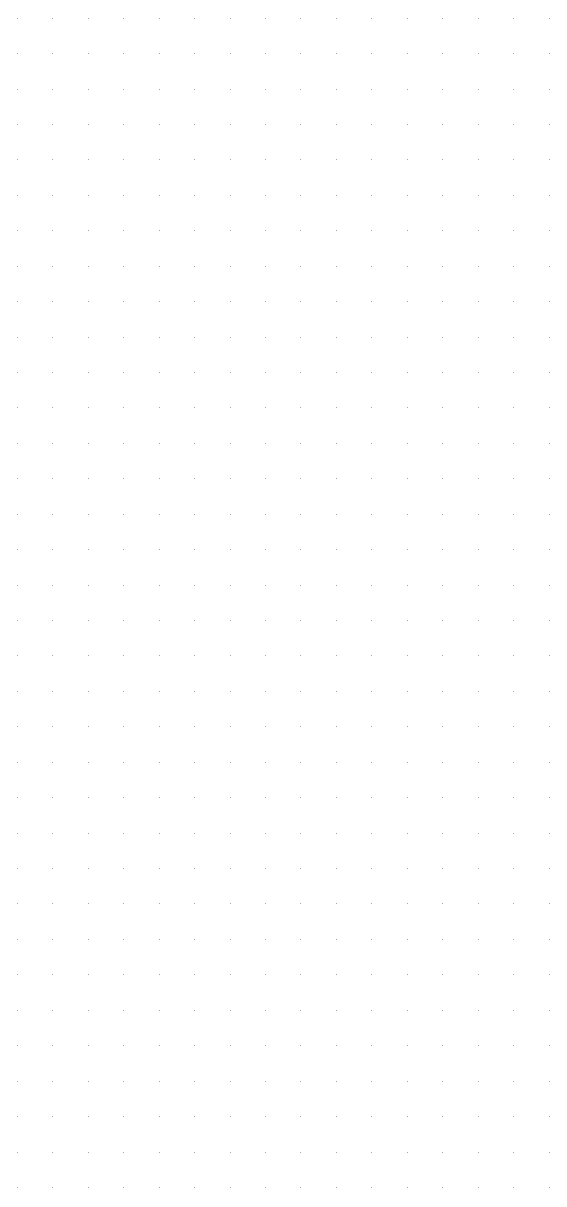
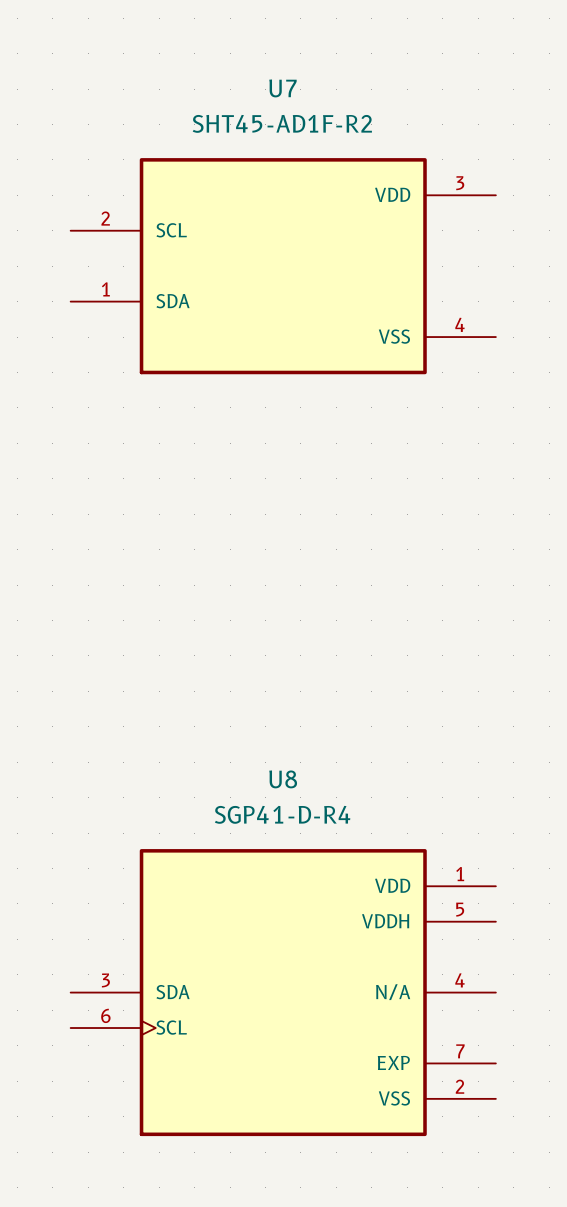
U7: none -> SHT45-AD1F-R2 (283, 266)
U8: none -> SGP41-D-R4 (283, 992)

